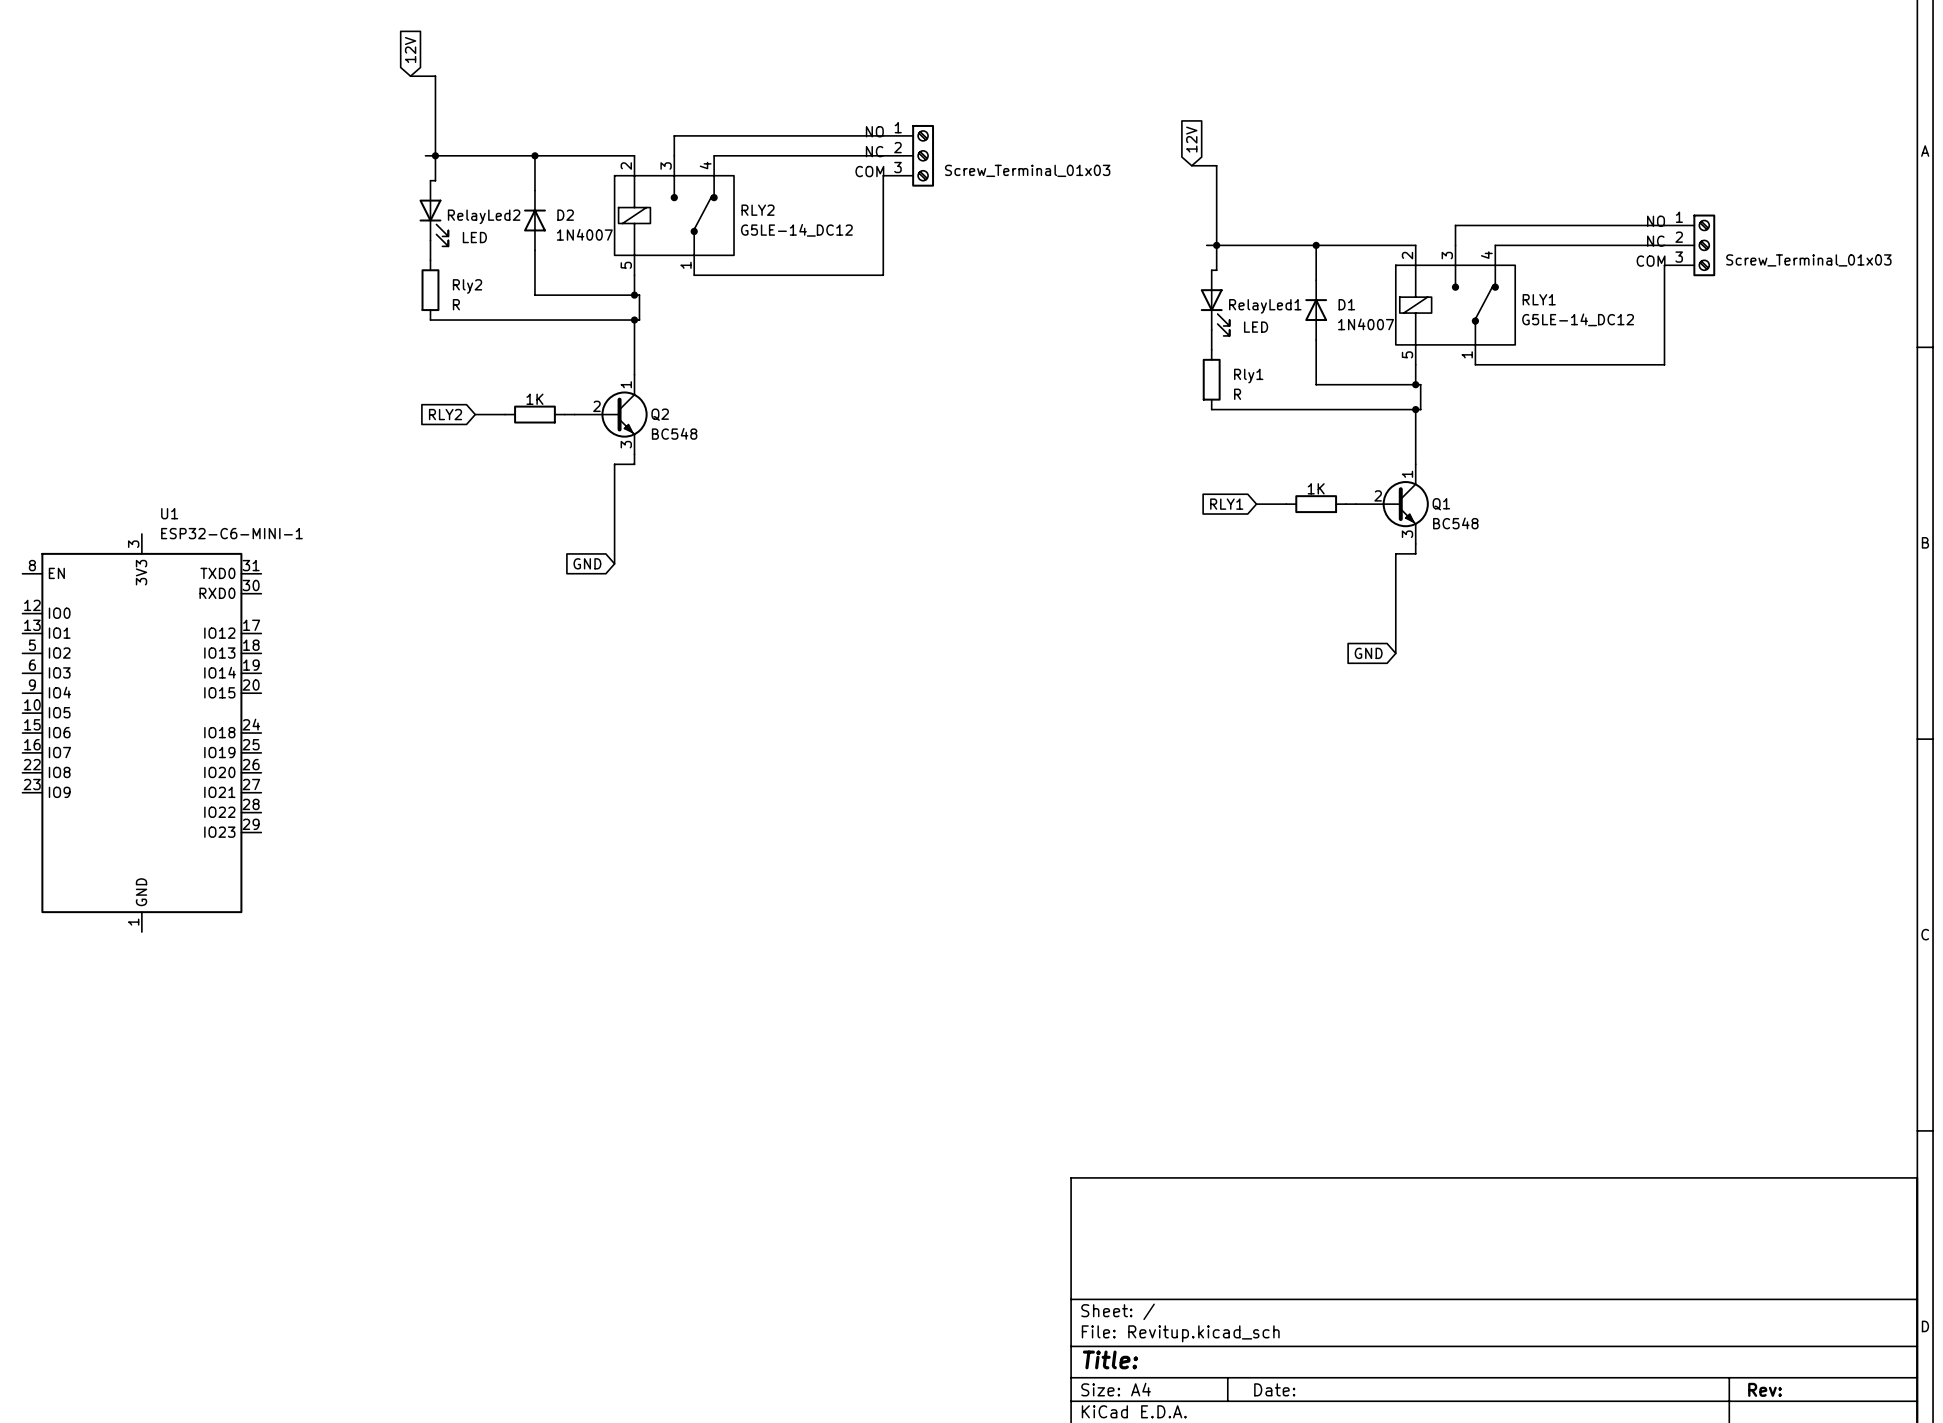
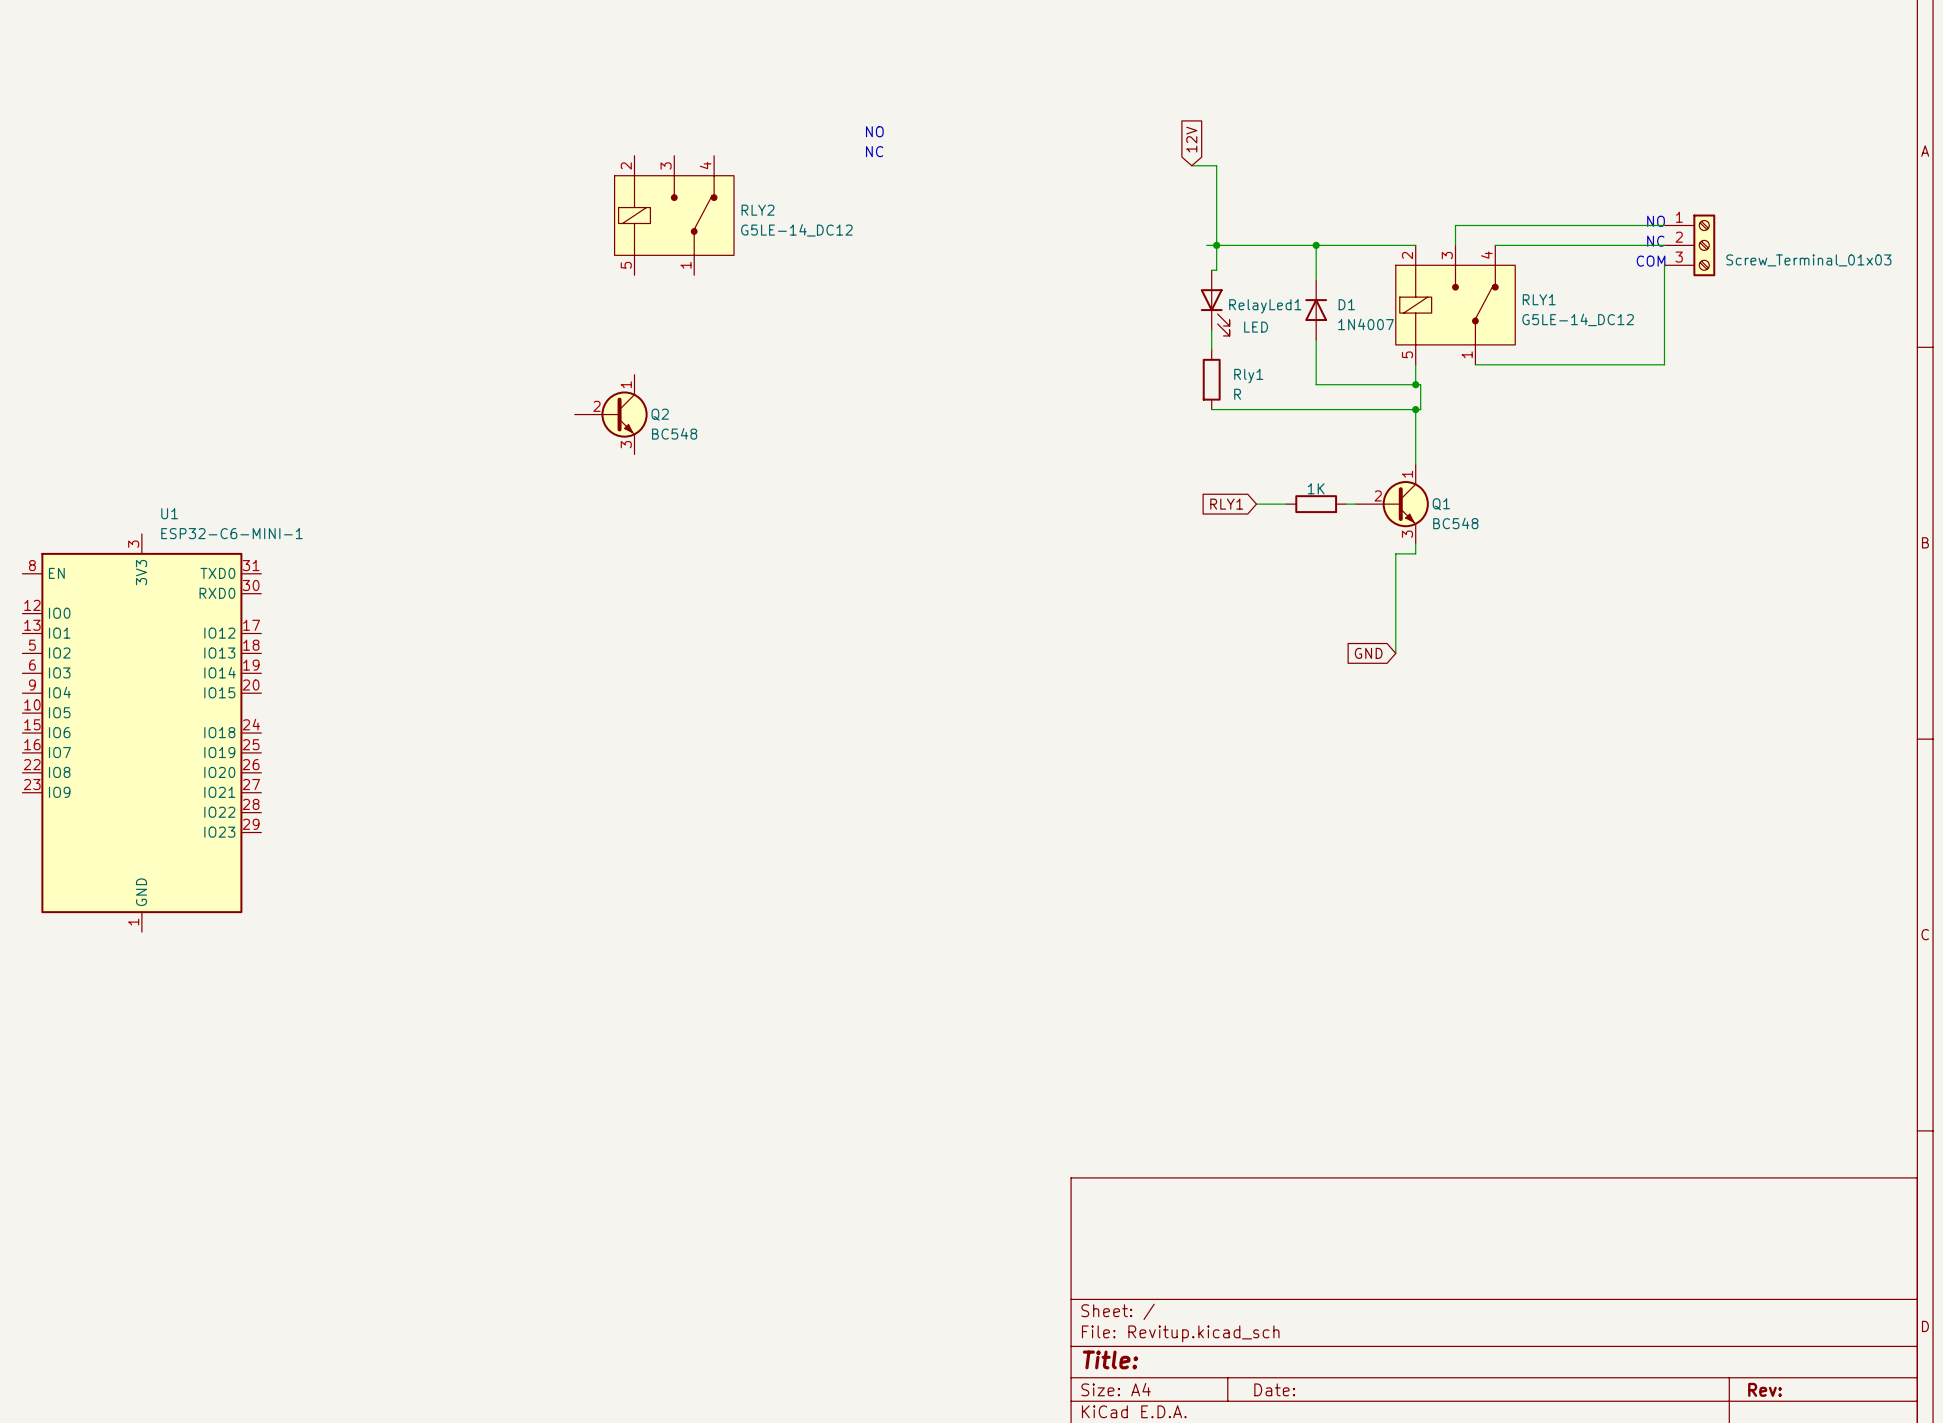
global label: 12V (410, 50) -> none
wire: (410, 76) (435, 76) (435, 180) (430, 180) -> none
wire: (883, 135) (674, 135) (674, 155) -> none
wire: (425, 155) (634, 155) -> none
junction: (435, 155) -> none
wire: (534, 155) (534, 190) -> none
junction: (534, 155) -> none
wire: (714, 155) (883, 155) -> none
part: Screw_Terminal_01x03 (908, 155) -> none
text: COM (869, 171) -> none
wire: (883, 175) (883, 275) (694, 275) -> none
RelayLed2: LED (433, 213) -> none
D2: 1N4007 (534, 220) -> none
wire: (430, 240) (430, 260) -> none
wire: (534, 250) (534, 295) (639, 295) (639, 320) (430, 320) -> none
wire: (634, 275) (634, 295) -> none
Rly2: R (430, 290) -> none
junction: (634, 295) -> none
wire: (634, 320) (634, 374) -> none
junction: (634, 320) -> none
global label: RLY2 (445, 414) -> none
wire: (475, 414) (505, 414) -> none
part: 1K (534, 414) -> none
wire: (564, 414) (574, 414) -> none
wire: (634, 454) (634, 464) (614, 464) (614, 563) -> none
global label: GND (587, 563) -> none

